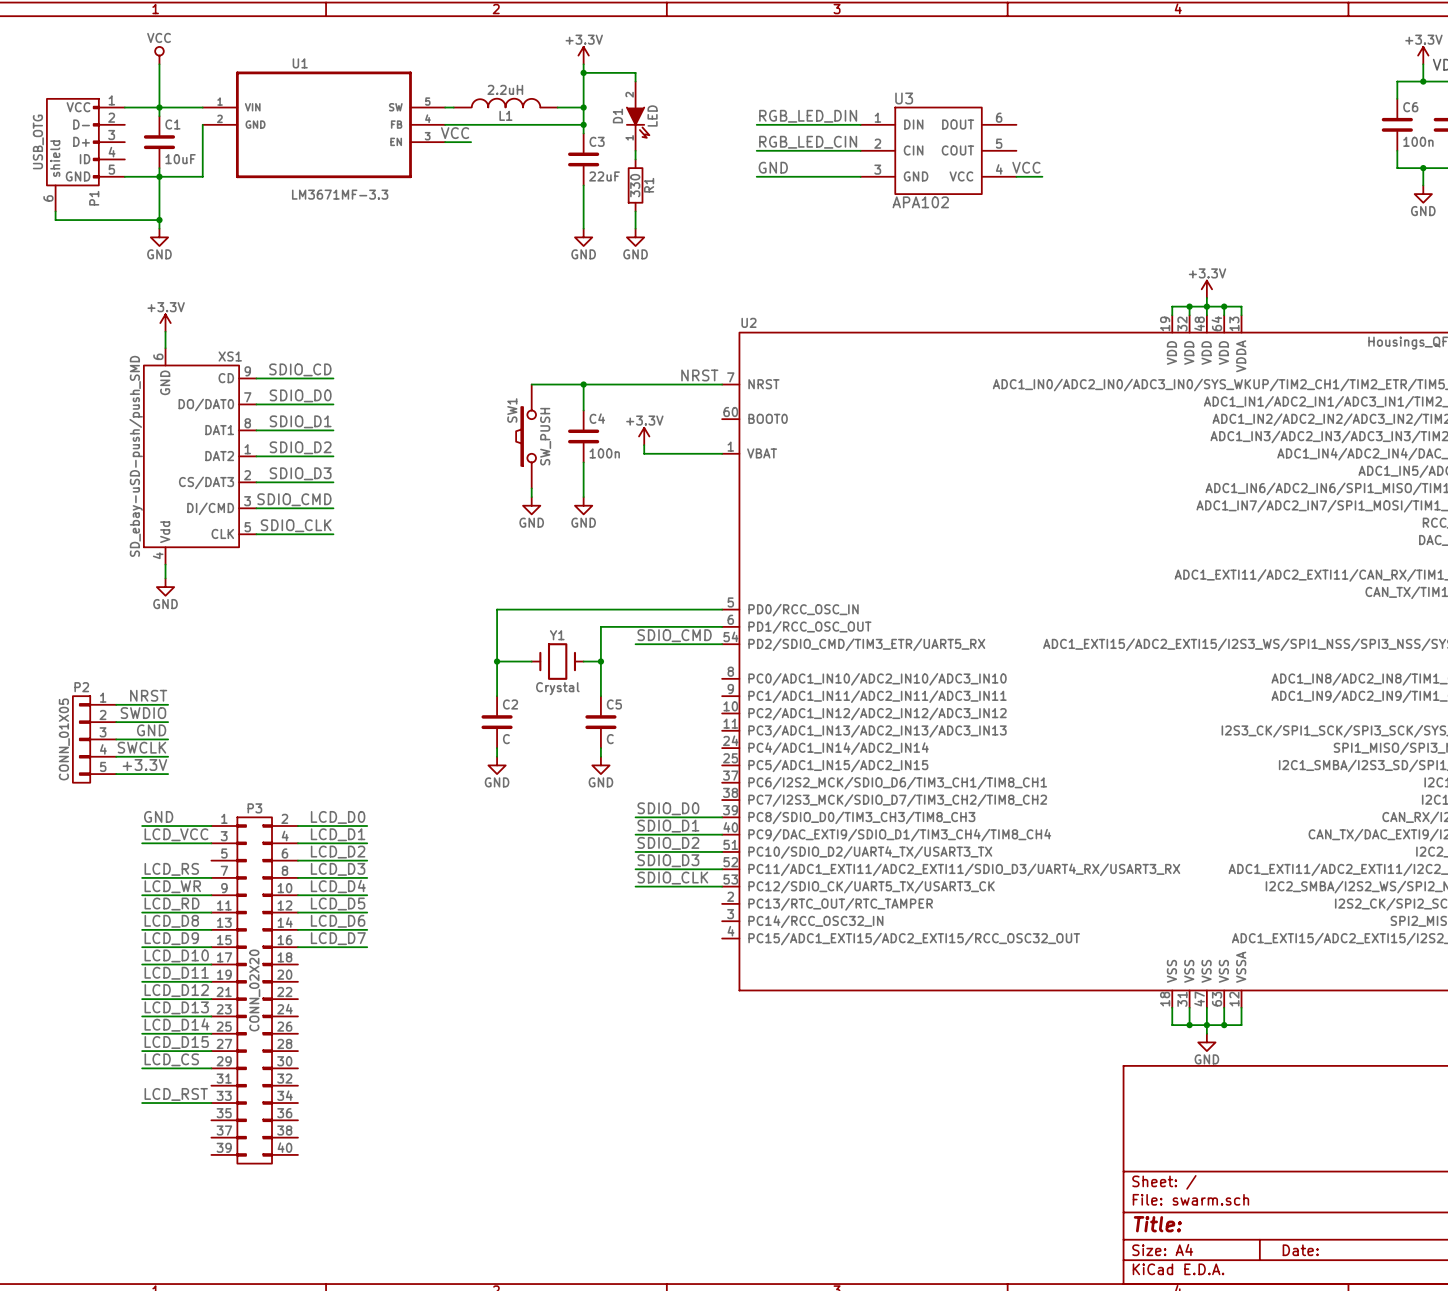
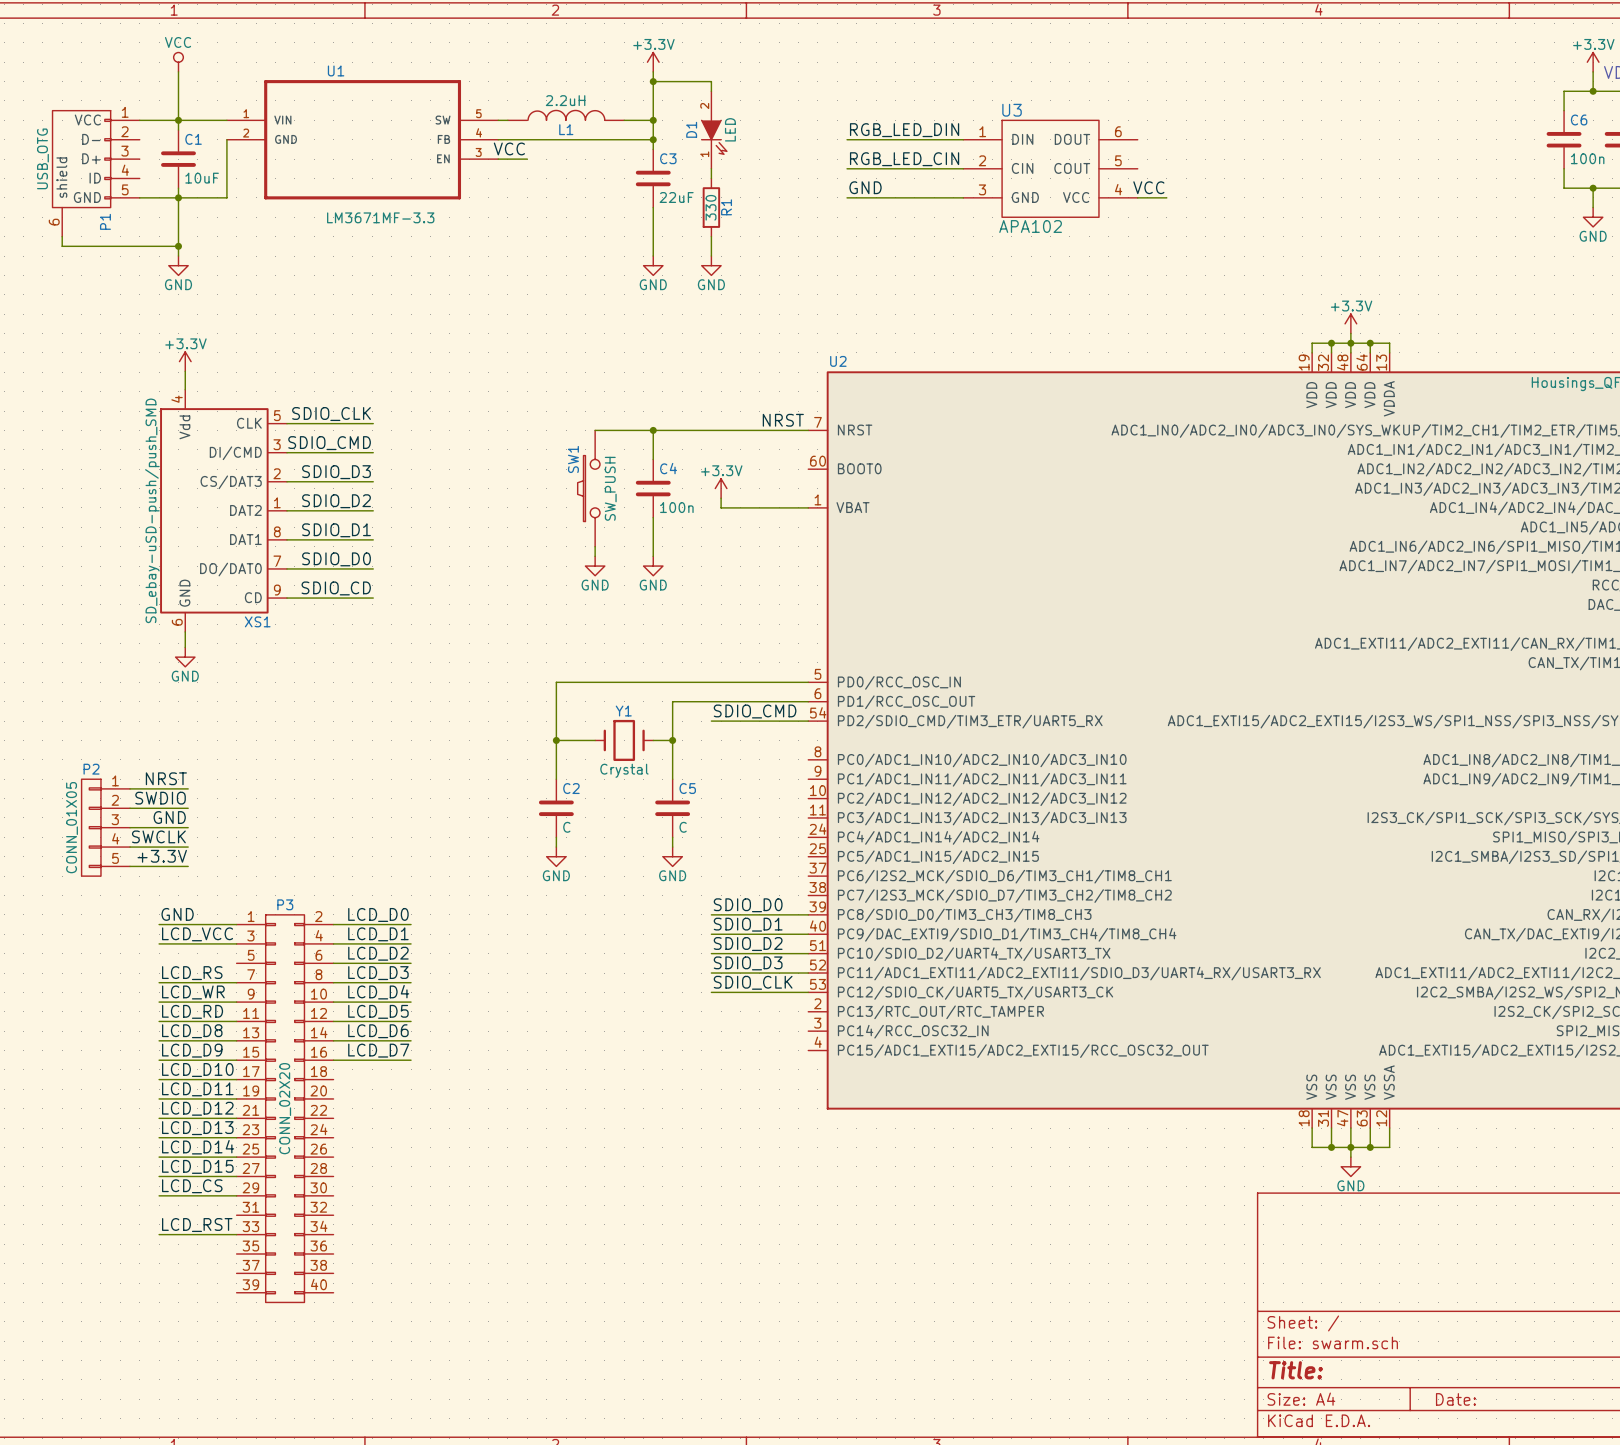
label: SDIO_CD (300, 369) -> SDIO_CLK (331, 414)
label: SDIO_D0 (300, 395) -> SDIO_CMD (329, 443)
label: SDIO_D1 (300, 421) -> SDIO_D3 (336, 472)
XS1 flip: as is (191, 456) -> up-down (214, 510)
label: SDIO_D3 (300, 473) -> SDIO_D1 (336, 530)
label: SDIO_CMD (294, 499) -> SDIO_D0 (336, 559)
label: SDIO_CLK (296, 525) -> SDIO_CD (336, 588)

